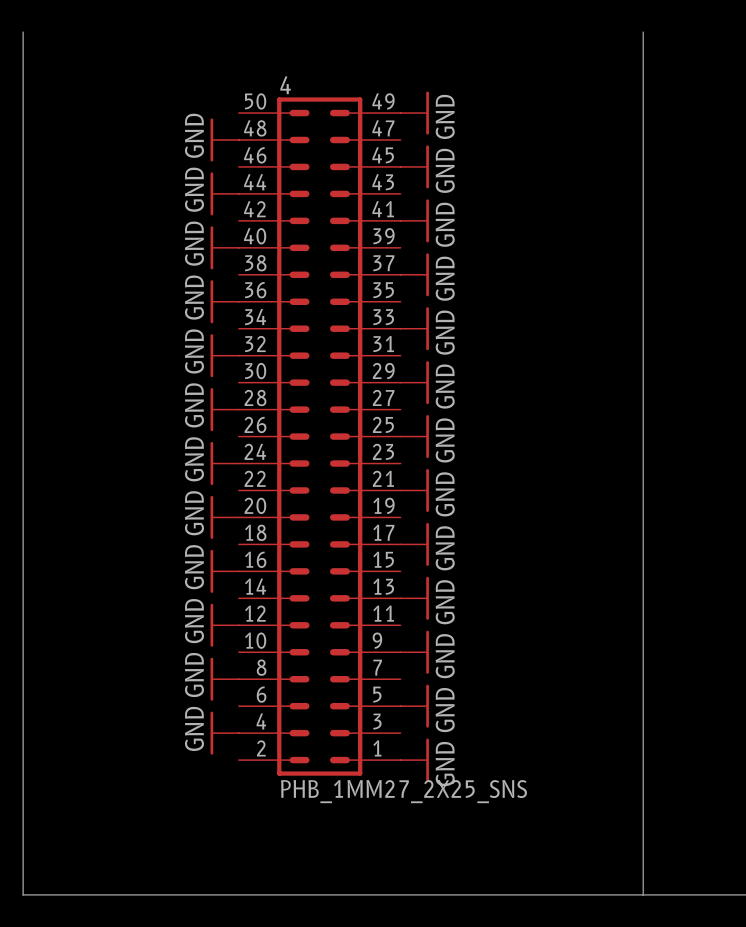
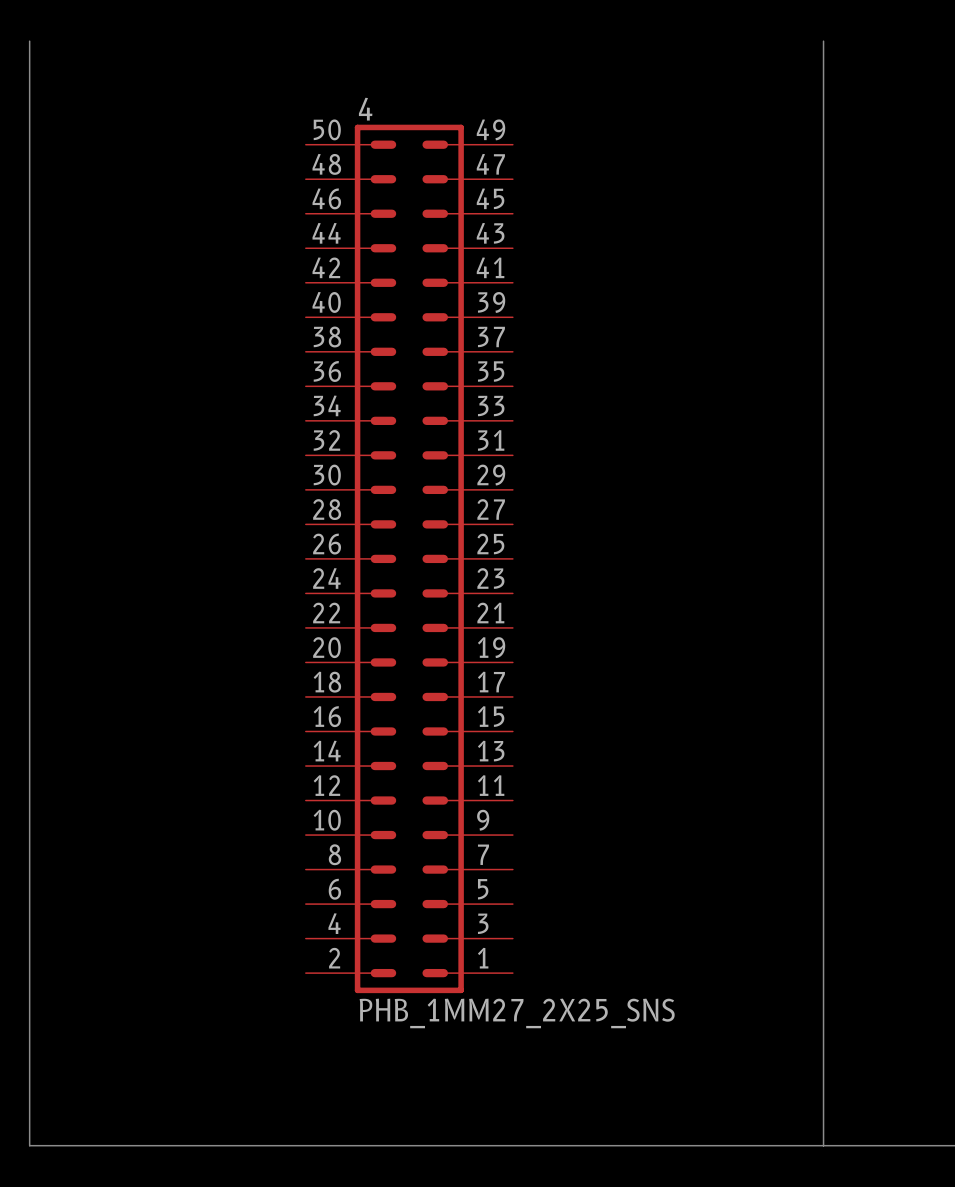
power symbol: GND (414, 113) -> none
power symbol: GND (224, 139) -> none
power symbol: GND (414, 166) -> none
power symbol: GND (224, 193) -> none
power symbol: GND (414, 220) -> none
power symbol: GND (224, 247) -> none
power symbol: GND (414, 274) -> none
power symbol: GND (224, 301) -> none
power symbol: GND (414, 328) -> none
power symbol: GND (224, 355) -> none
power symbol: GND (414, 382) -> none
power symbol: GND (224, 409) -> none
power symbol: GND (414, 436) -> none
power symbol: GND (224, 463) -> none
power symbol: GND (414, 490) -> none
power symbol: GND (224, 517) -> none
power symbol: GND (414, 544) -> none
power symbol: GND (224, 571) -> none
power symbol: GND (414, 598) -> none
power symbol: GND (224, 625) -> none
power symbol: GND (414, 652) -> none
power symbol: GND (224, 679) -> none
power symbol: GND (414, 706) -> none
power symbol: GND (224, 733) -> none
power symbol: GND (414, 760) -> none

